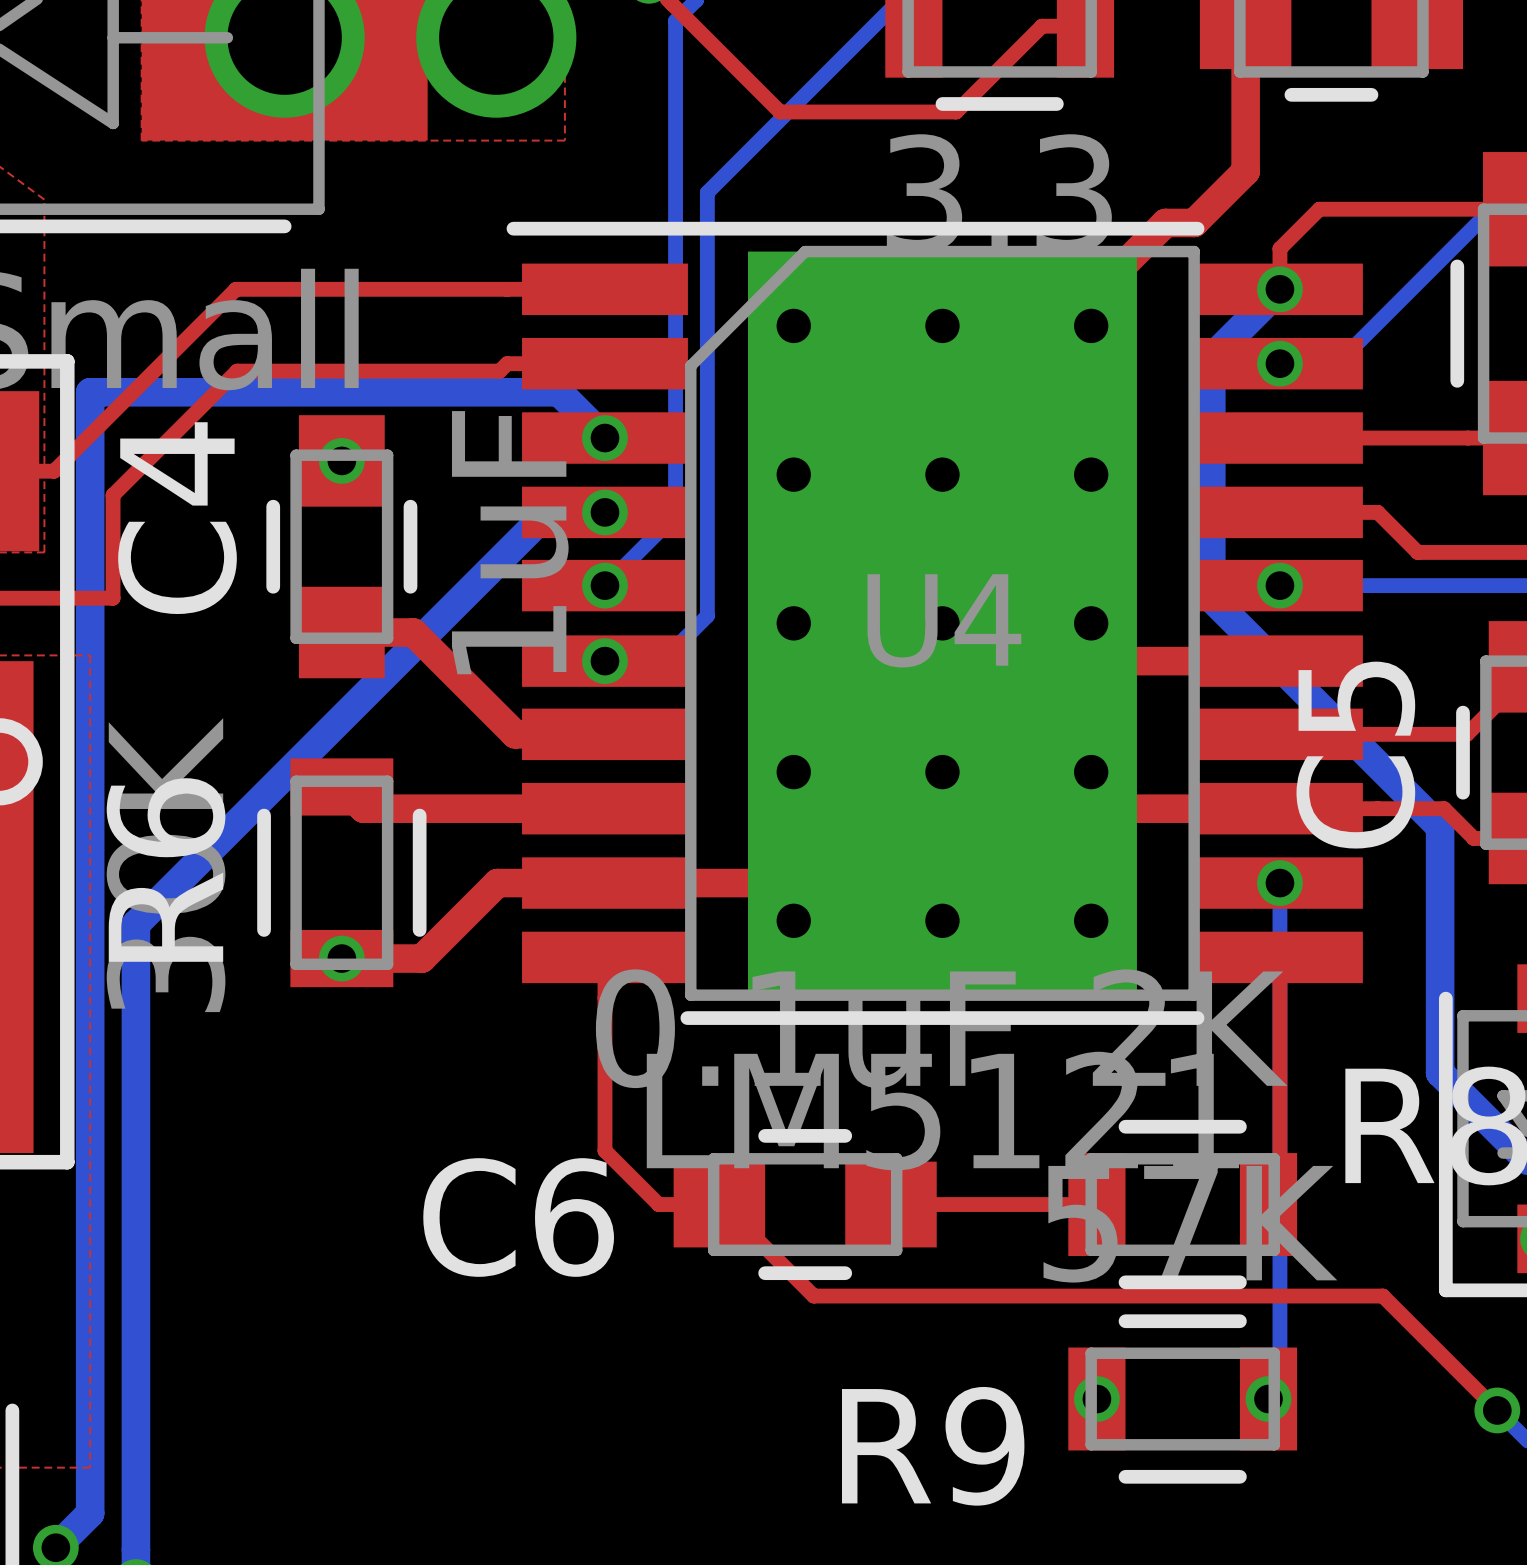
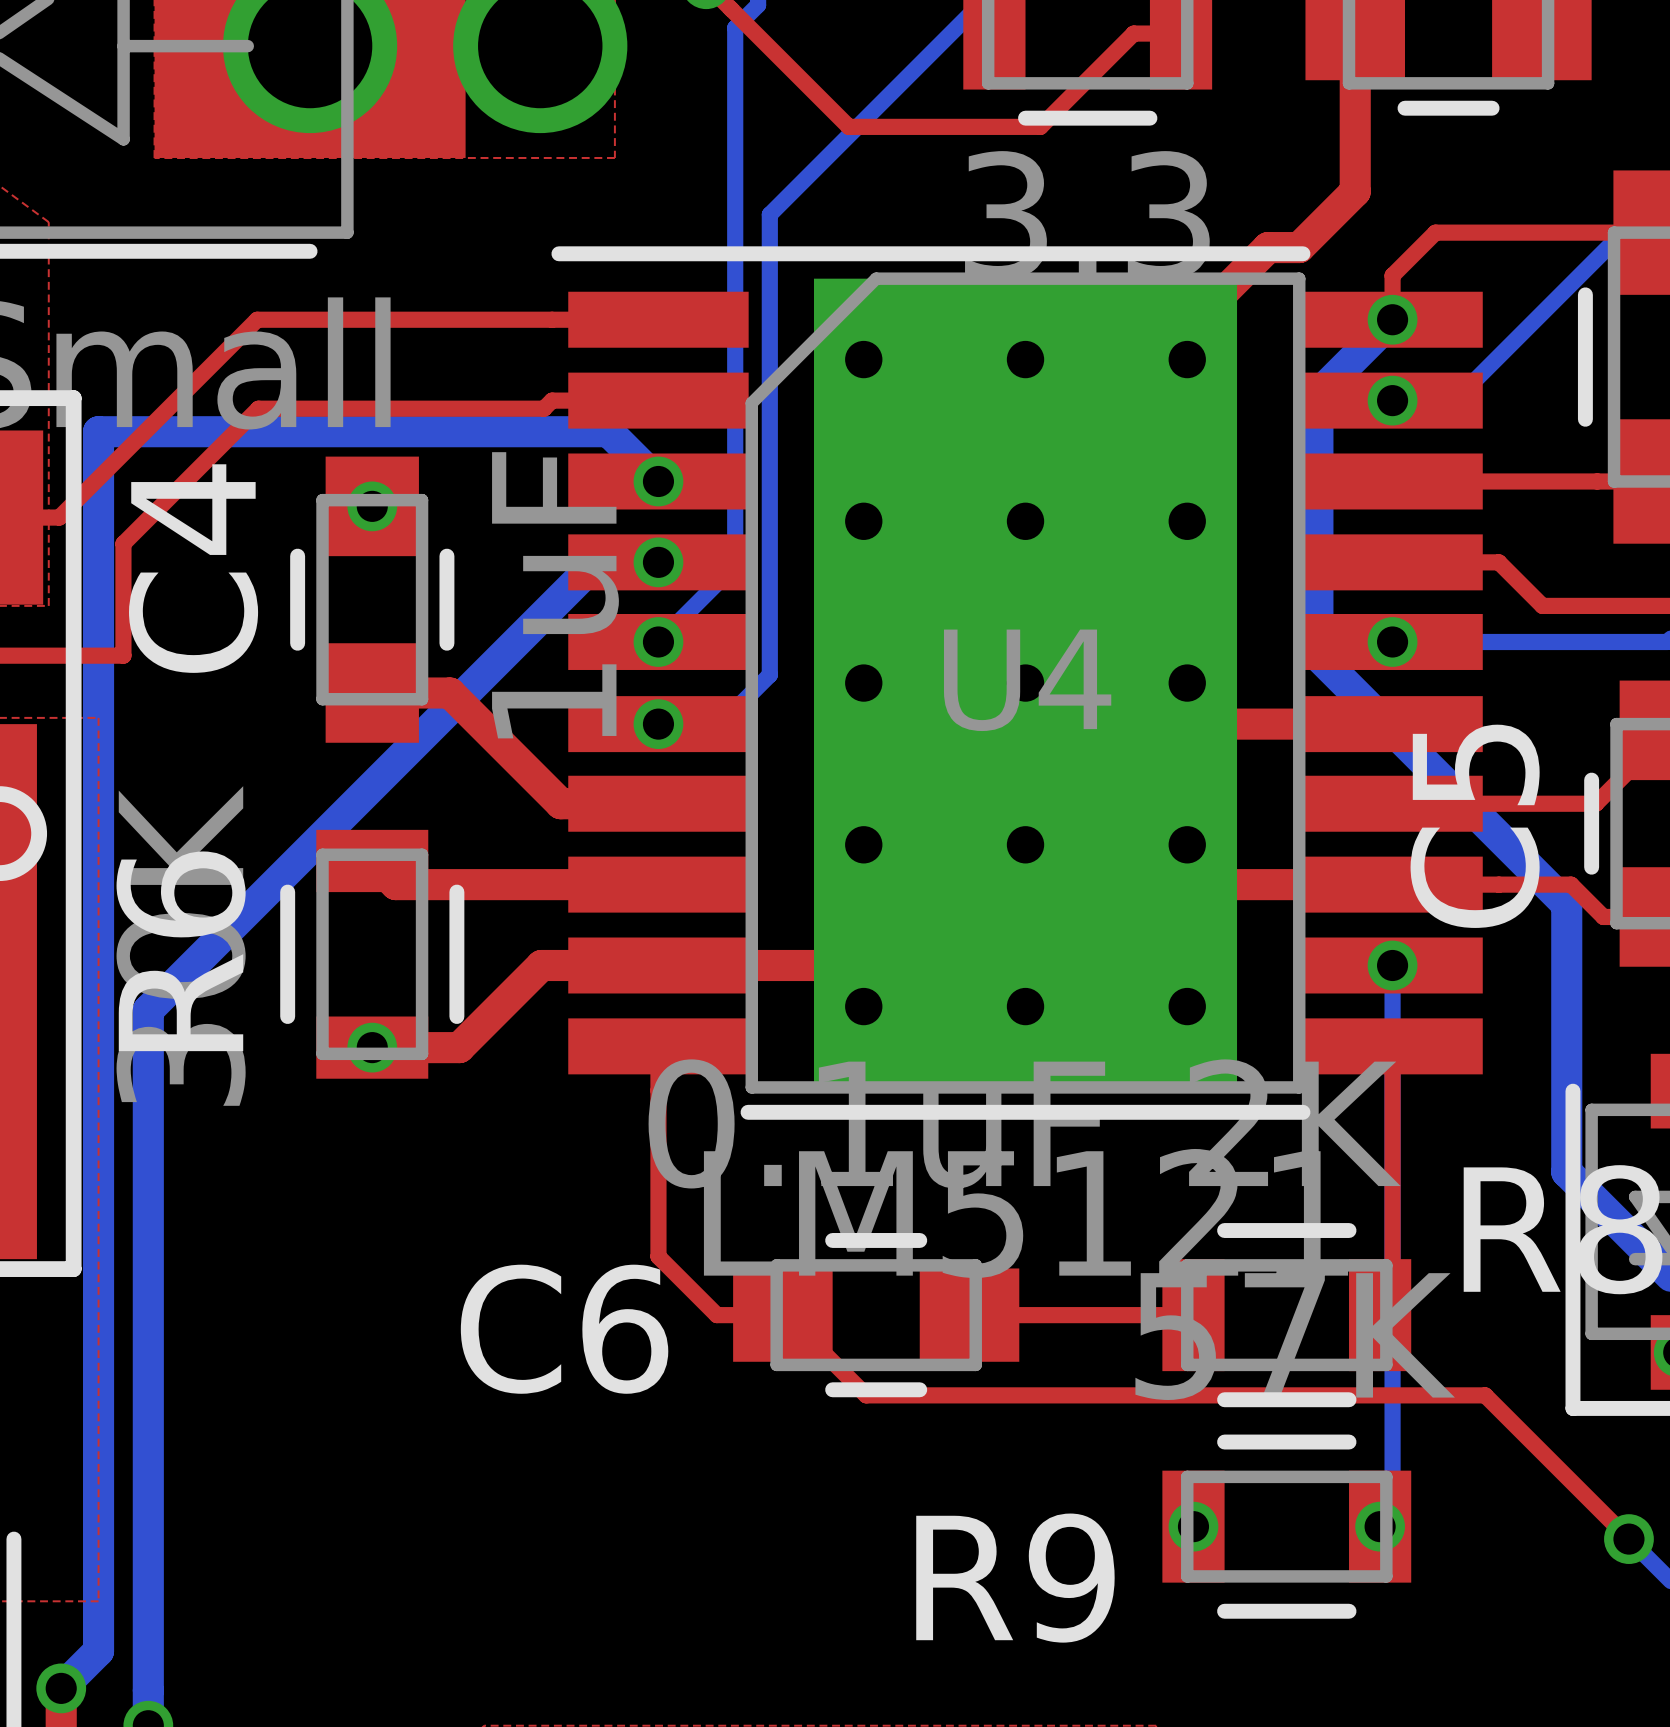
top track: (796, 1278) (813, 1296) (1382, 1296) -> (866, 1395) (1485, 1395) (1504, 1414)

